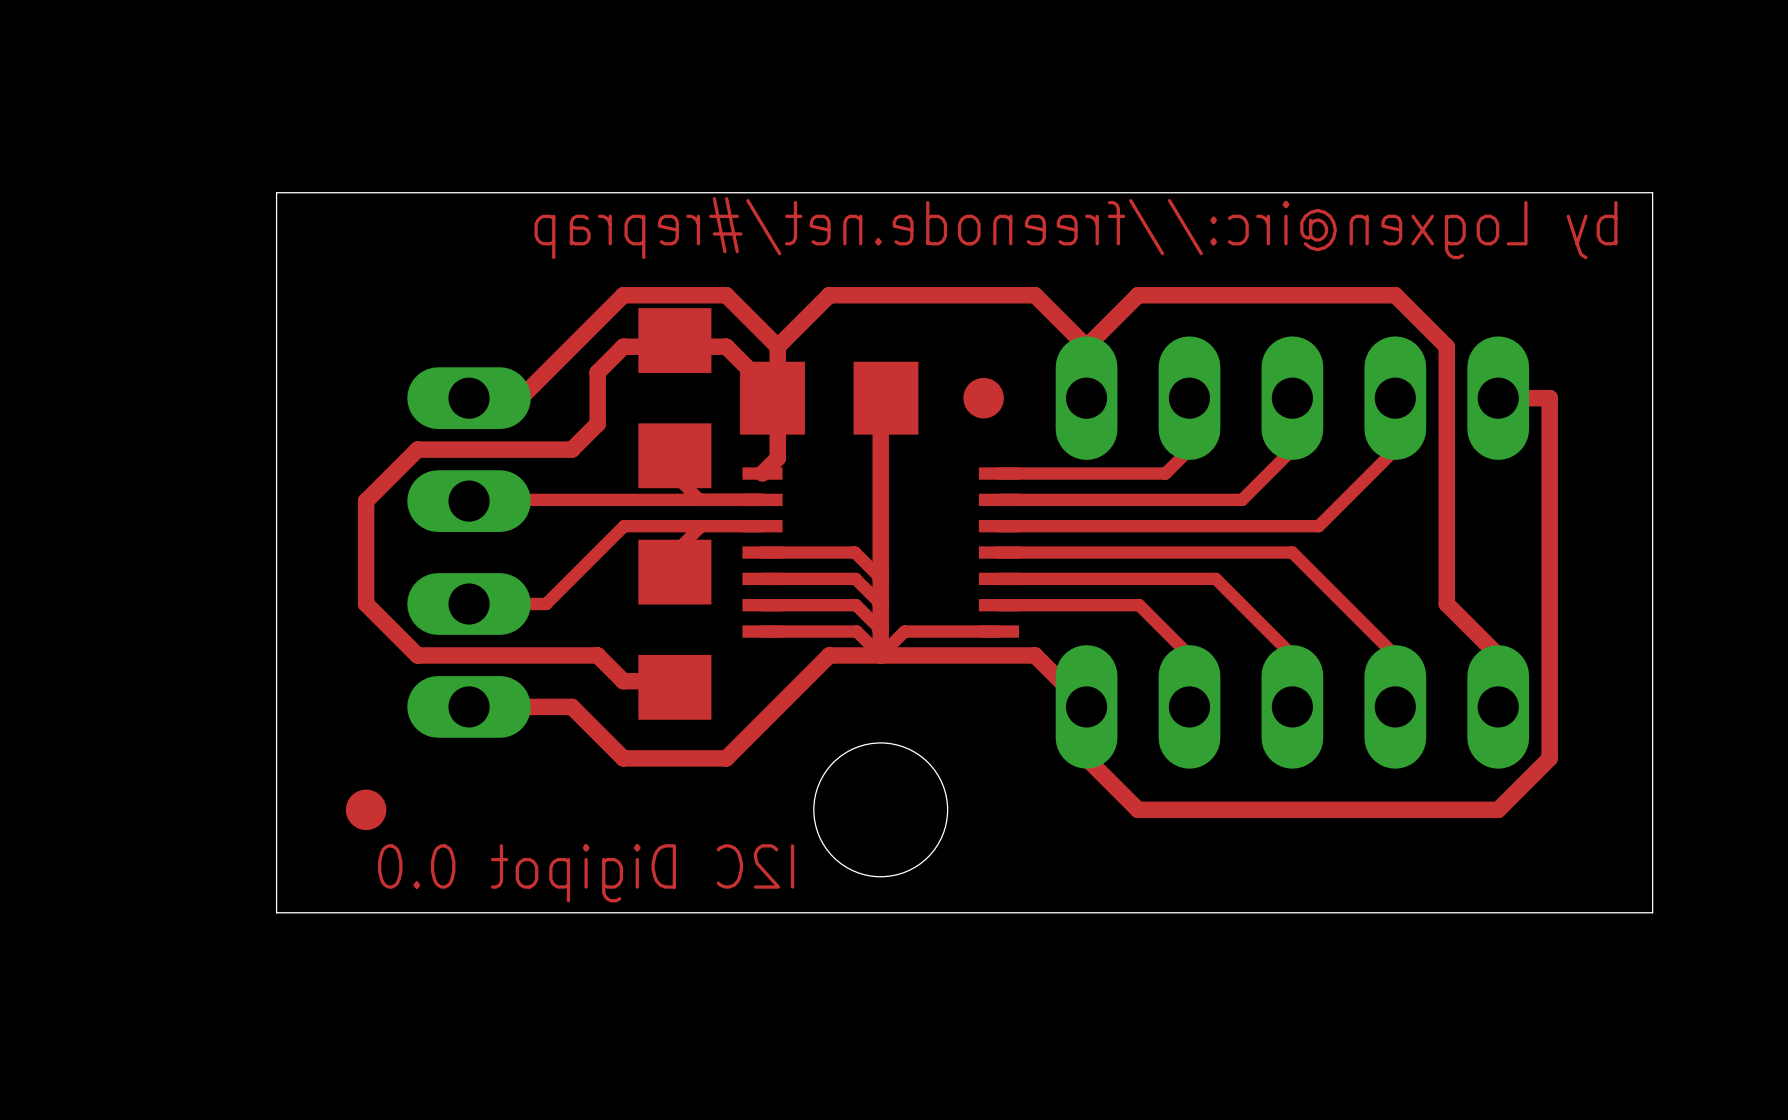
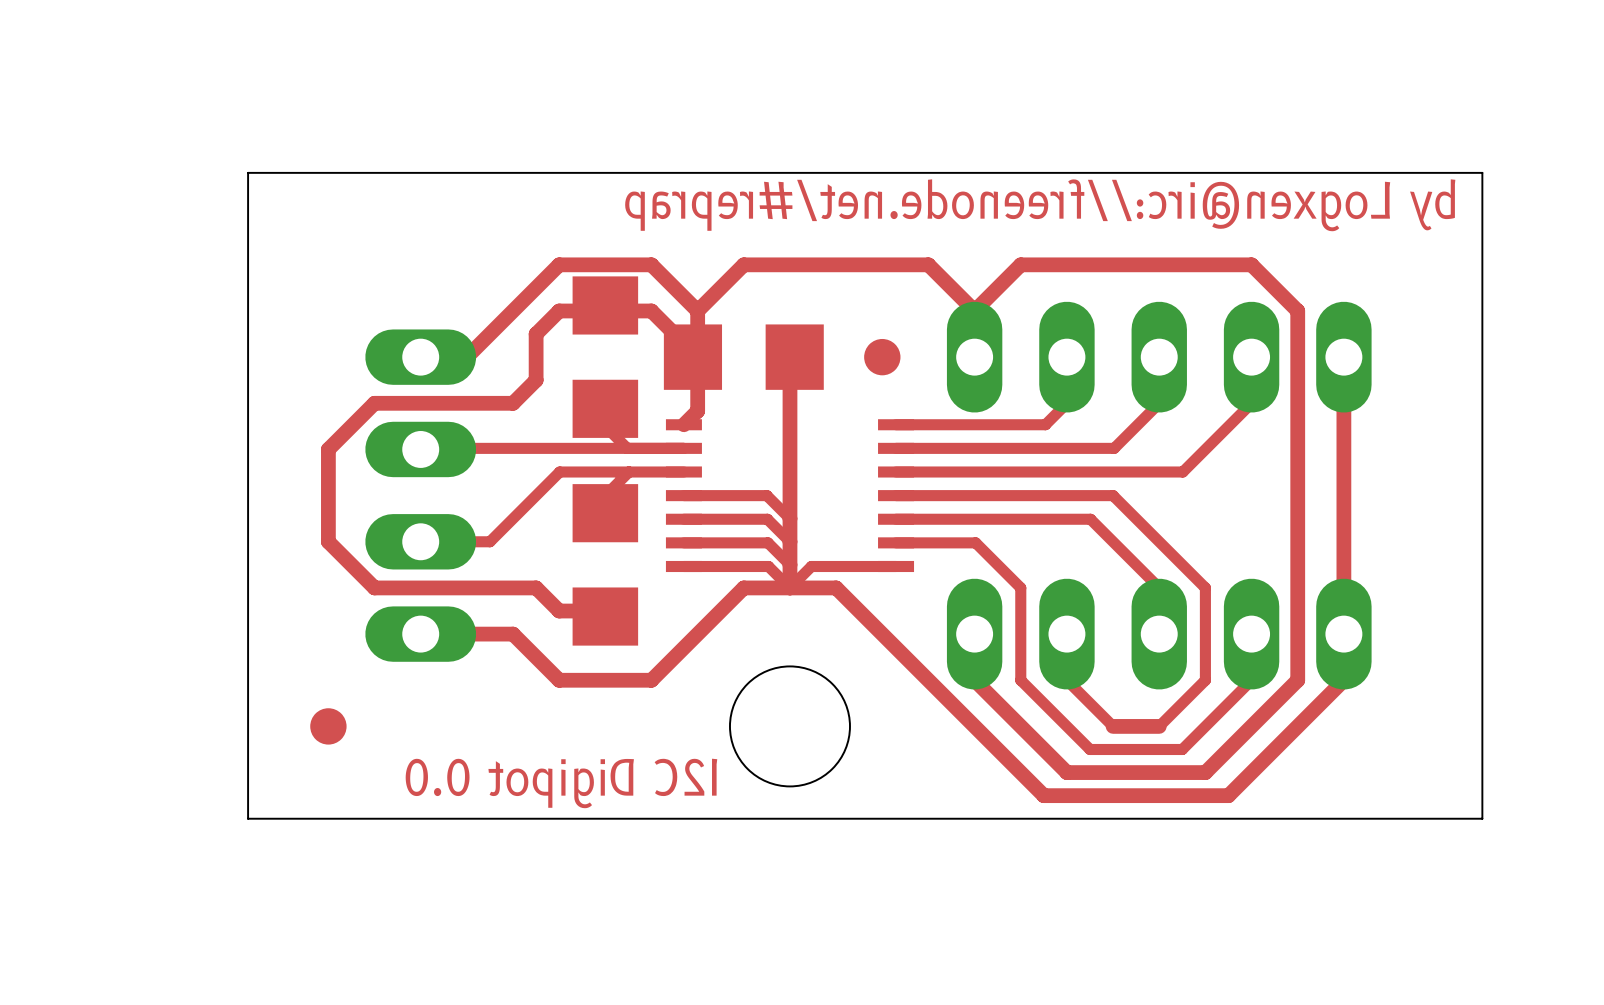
top track: (1498, 398) (1549, 398) (1549, 758) (1498, 809) (1292, 809) -> none
top track: (1240, 552) (1292, 552) (1395, 655) (1395, 706) -> (1113, 495) (1205, 587) (1205, 680) (1159, 726)
top track: (1446, 604) (1498, 655) -> (1343, 357) (1343, 587)
top track: none -> (1297, 541) (1297, 680) (1205, 772) (1066, 772) (1020, 726)
top track: (1087, 605) (1139, 605) (1189, 655) (1189, 706) -> (975, 542) (1020, 587) (1020, 680) (1090, 749) (1182, 749) (1251, 680) (1251, 634)
top track: (932, 655) (1035, 655) (1086, 706) -> (836, 587) (1043, 795) (1228, 795) (1343, 680) (1343, 634)
top track: (1240, 809) (1138, 809) -> (1113, 726) (1066, 680) (1066, 634)

